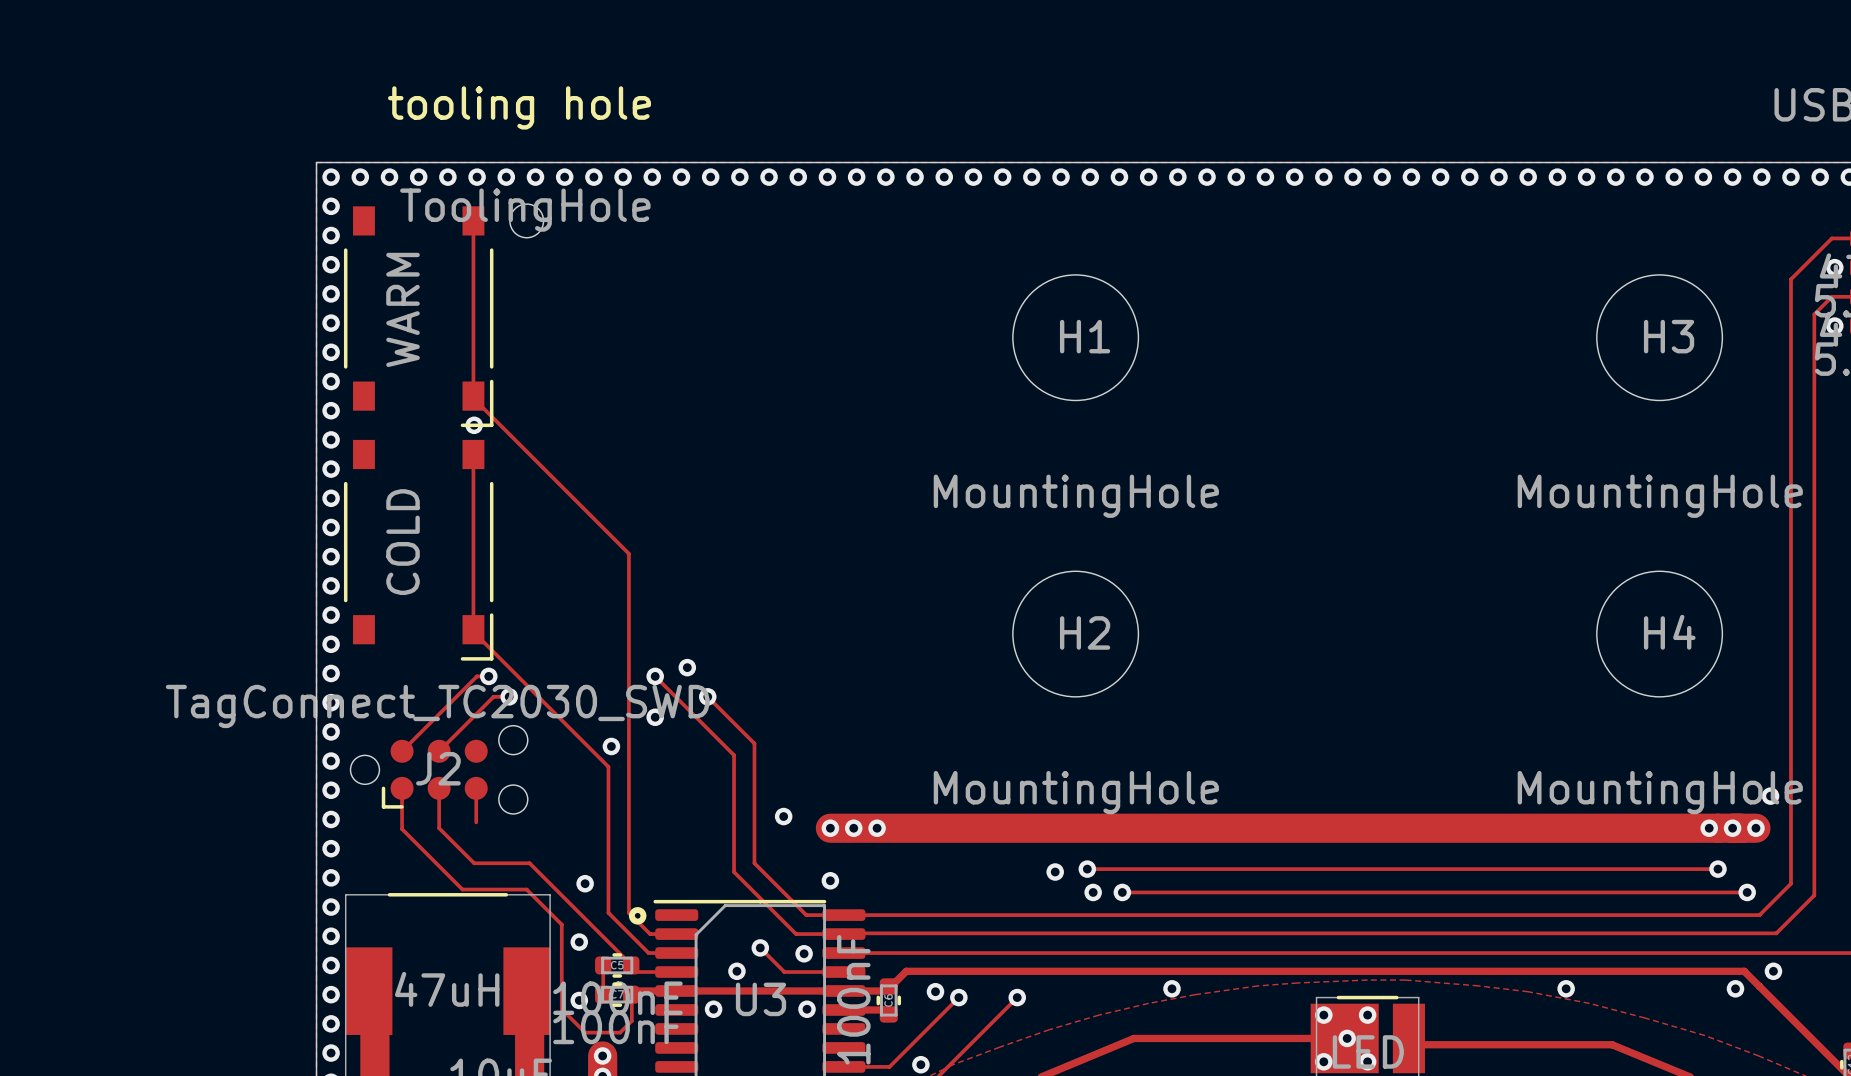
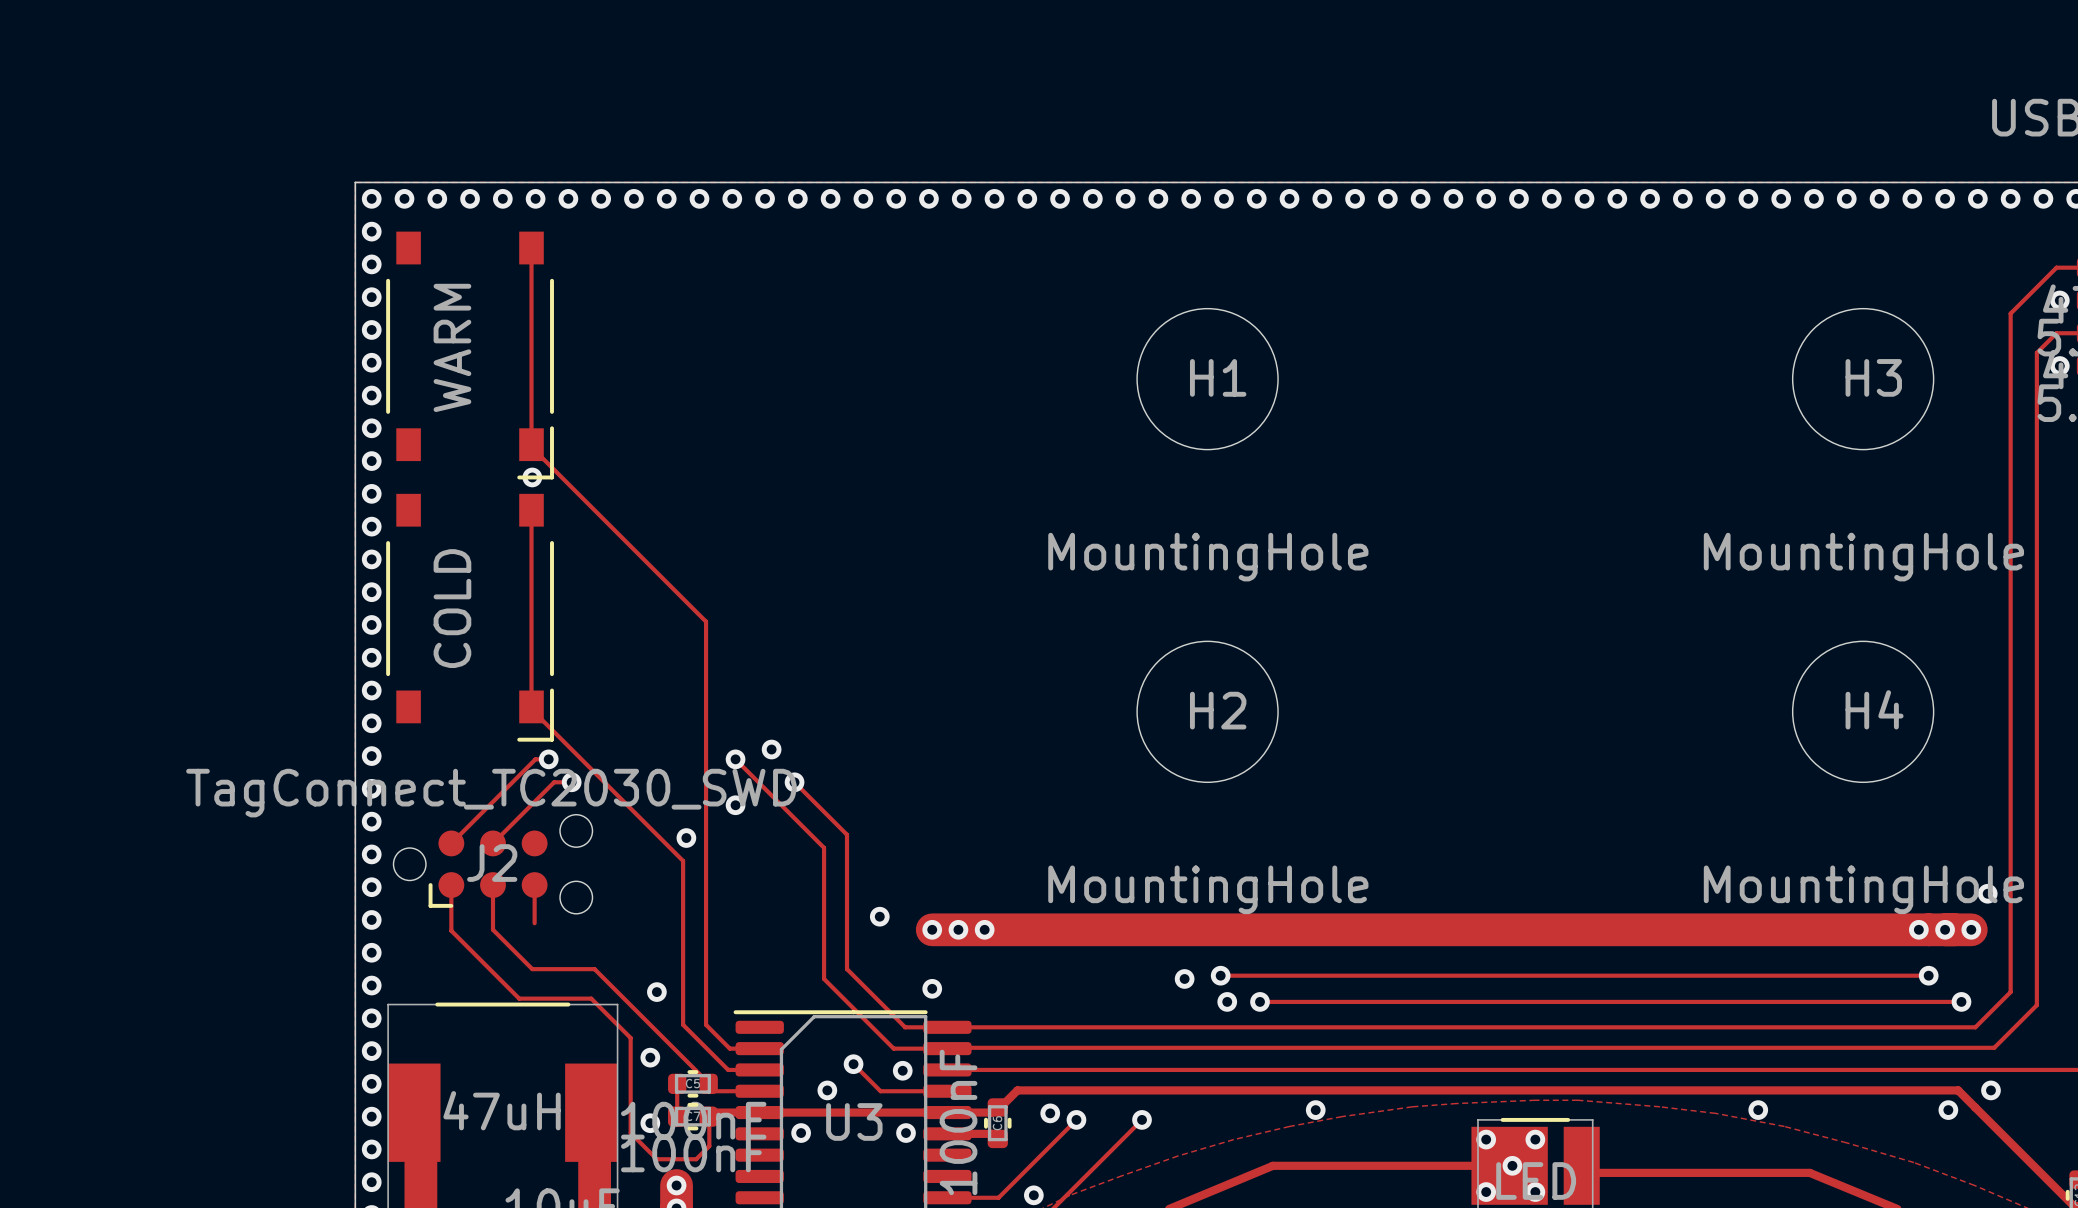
part: ToolingHole (526, 220) -> none
drawing: [628, 907, 647, 925] -> none

